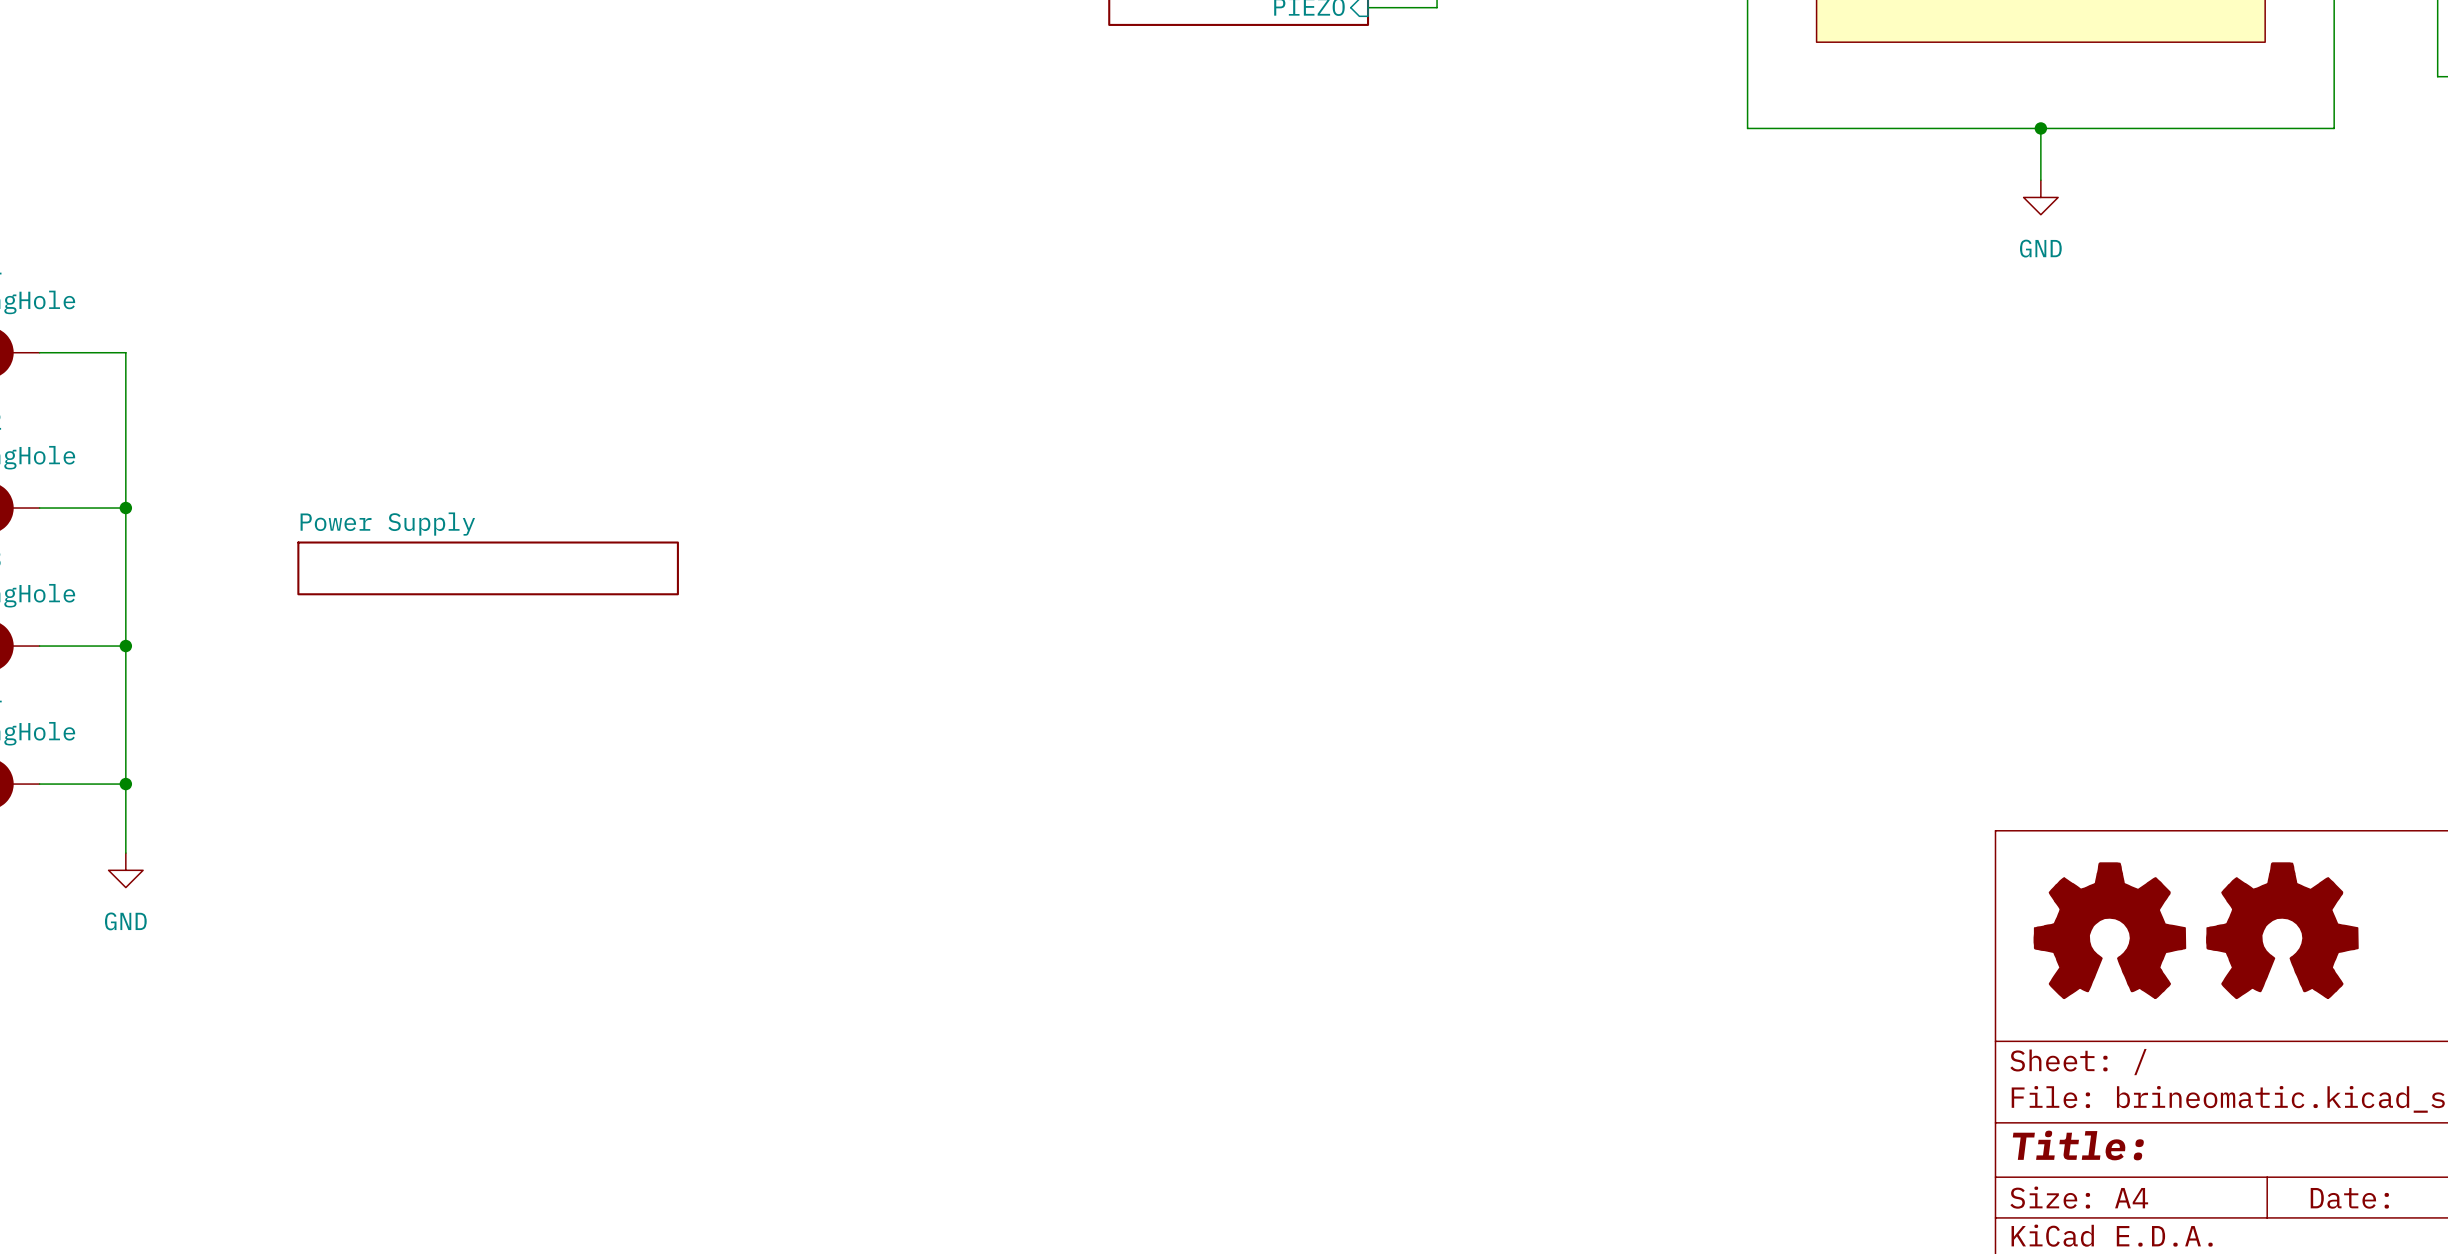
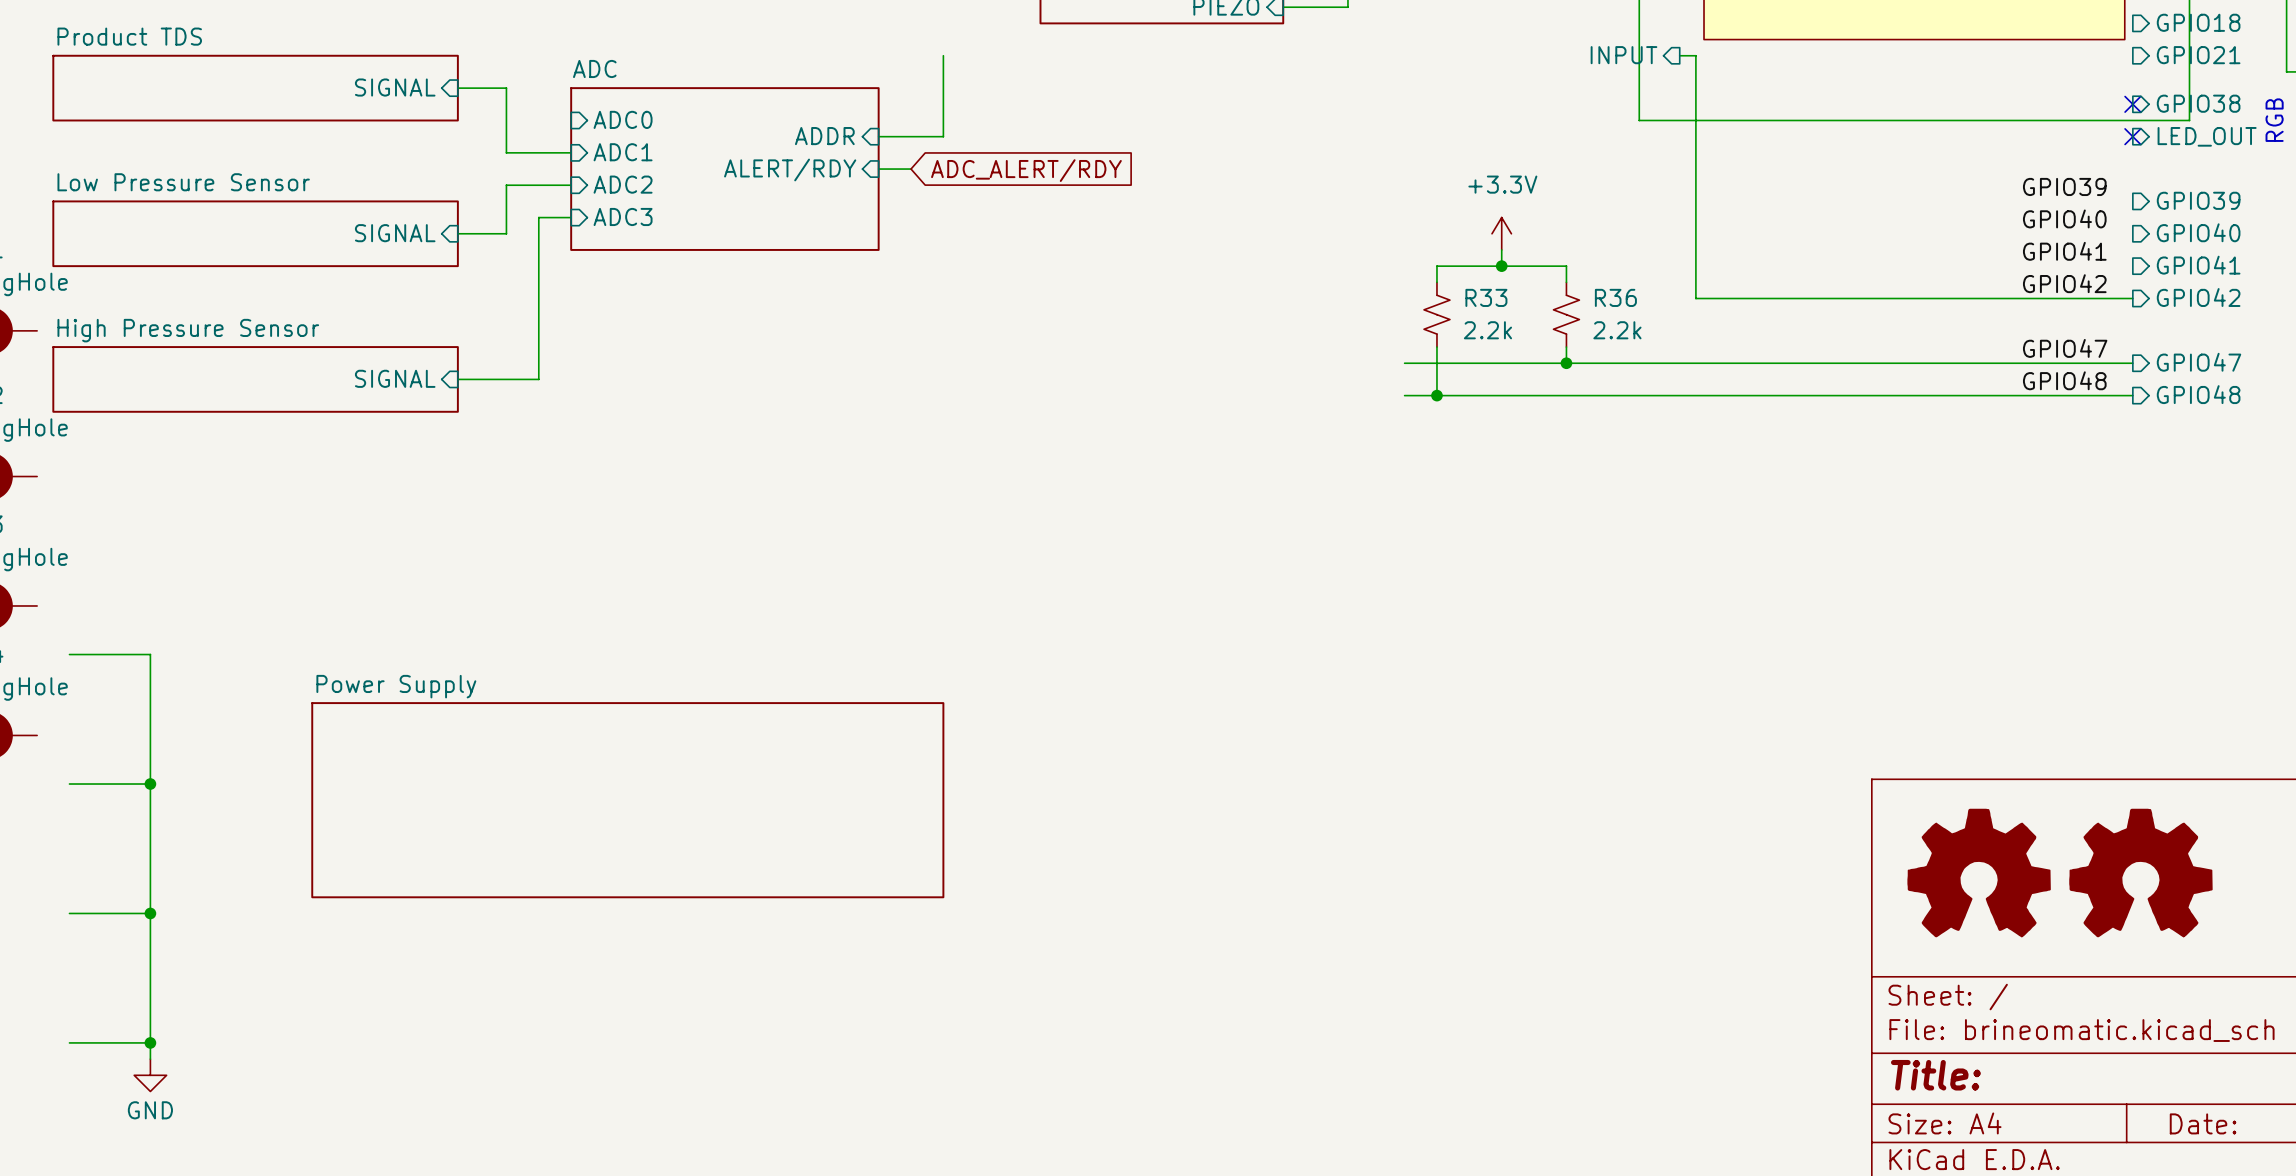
sheet pin: none -> GPIO18 (2198, 22)
sheet pin: none -> INPUT (1623, 55)
sheet pin: none -> GPIO21 (2198, 55)
wire: none -> (943, 55) (943, 136) (878, 136)
wire: none -> (1679, 55) (1695, 55) (1695, 298) (2132, 298)
sheet Product TDS: none -> (255, 88)
sheet pin: none -> SIGNAL (395, 87)
wire: none -> (457, 88) (506, 88) (506, 152) (571, 152)
sheet pin: none -> GPIO38 (2198, 103)
no-connect mark: none -> (2132, 104)
sheet pin: none -> ADC0 (623, 119)
wire: (2040, 128) (2040, 180) -> none
junction: (2040, 128) -> none
text: none -> RGB (2274, 120)
sheet pin: none -> ADDR (824, 136)
no-connect mark: none -> (2132, 136)
sheet pin: none -> LED_OUT (2207, 136)
sheet pin: none -> ADC1 (623, 152)
sheet ADC: none -> (724, 169)
sheet pin: none -> ALERT/RDY (790, 169)
wire: none -> (878, 169) (911, 169)
global label: none -> ADC_ALERT/RDY (1026, 170)
sheet pin: none -> ADC2 (623, 184)
wire: none -> (571, 185) (506, 185) (506, 233) (457, 233)
power symbol: GND (2040, 197) -> none
label: none -> GPIO39 (2064, 186)
sheet pin: none -> GPIO39 (2198, 200)
wire: none -> (571, 217) (538, 217) (538, 379) (457, 379)
sheet pin: none -> ADC3 (623, 216)
label: none -> GPIO40 (2064, 218)
sheet pin: none -> SIGNAL (395, 233)
sheet pin: none -> GPIO40 (2198, 232)
sheet Low Pressure Sensor: none -> (255, 233)
power symbol: none -> +3.3V (1501, 233)
wire: none -> (1501, 249) (1501, 266)
label: none -> GPIO41 (2064, 251)
junction: none -> (1501, 266)
sheet pin: none -> GPIO41 (2198, 265)
wire: none -> (1436, 282) (1436, 266) (1566, 266) (1566, 282)
label: none -> GPIO42 (2064, 283)
sheet pin: none -> GPIO42 (2198, 297)
R33: none -> 2.2k (1436, 314)
R36: none -> 2.2k (1566, 314)
wire: (39, 352) (125, 352) (125, 853) -> none
wire: none -> (1436, 347) (1436, 395)
wire: none -> (1566, 347) (1566, 363)
label: none -> GPIO47 (2065, 348)
sheet pin: none -> GPIO47 (2199, 362)
wire: none -> (1404, 363) (2132, 363)
junction: none -> (1566, 363)
sheet pin: none -> SIGNAL (395, 378)
sheet High Pressure Sensor: none -> (255, 379)
label: none -> GPIO48 (2064, 380)
wire: none -> (1404, 395) (2132, 395)
junction: none -> (1436, 395)
sheet pin: none -> GPIO48 (2198, 394)
wire: (39, 508) (125, 508) -> (69, 784) (150, 784)
junction: (125, 508) -> none
sheet Power Supply: (488, 568) -> none
wire: (39, 646) (125, 646) -> (69, 913) (150, 913)
junction: (125, 646) -> none
wire: none -> (69, 654) (150, 654) (150, 1059)
wire: (39, 784) (125, 784) -> (69, 1042) (150, 1042)
junction position: (125, 784) -> (150, 784)
sheet Power Supply: none -> (627, 800)
power symbol position: GND (125, 870) -> GND (150, 1075)
power symbol text position: GND (125, 921) -> GND (150, 1110)
junction: none -> (150, 913)
junction: none -> (150, 1042)

